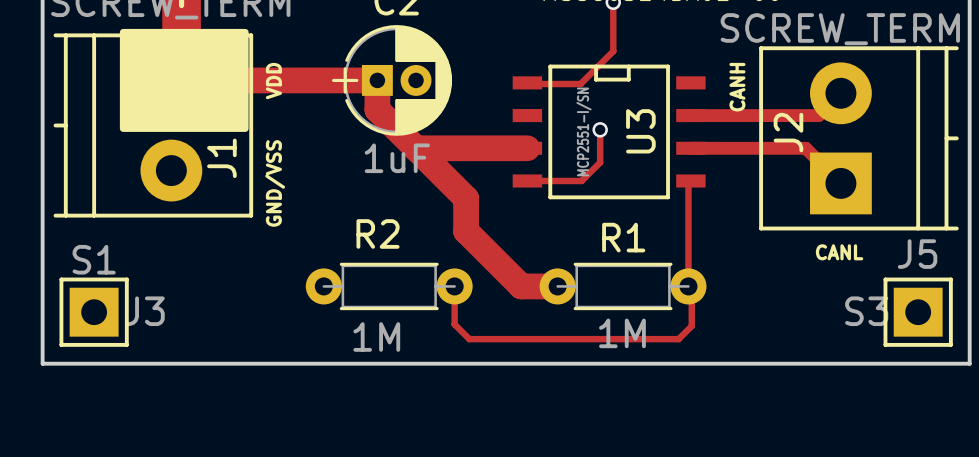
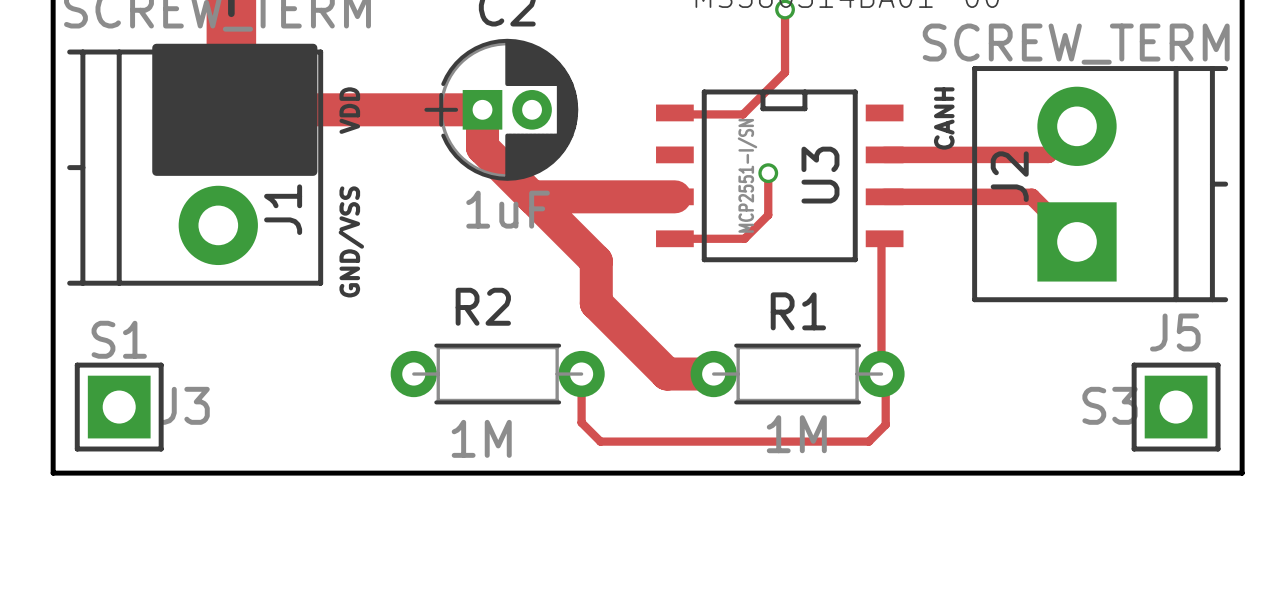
text: CANL (839, 252) -> none

